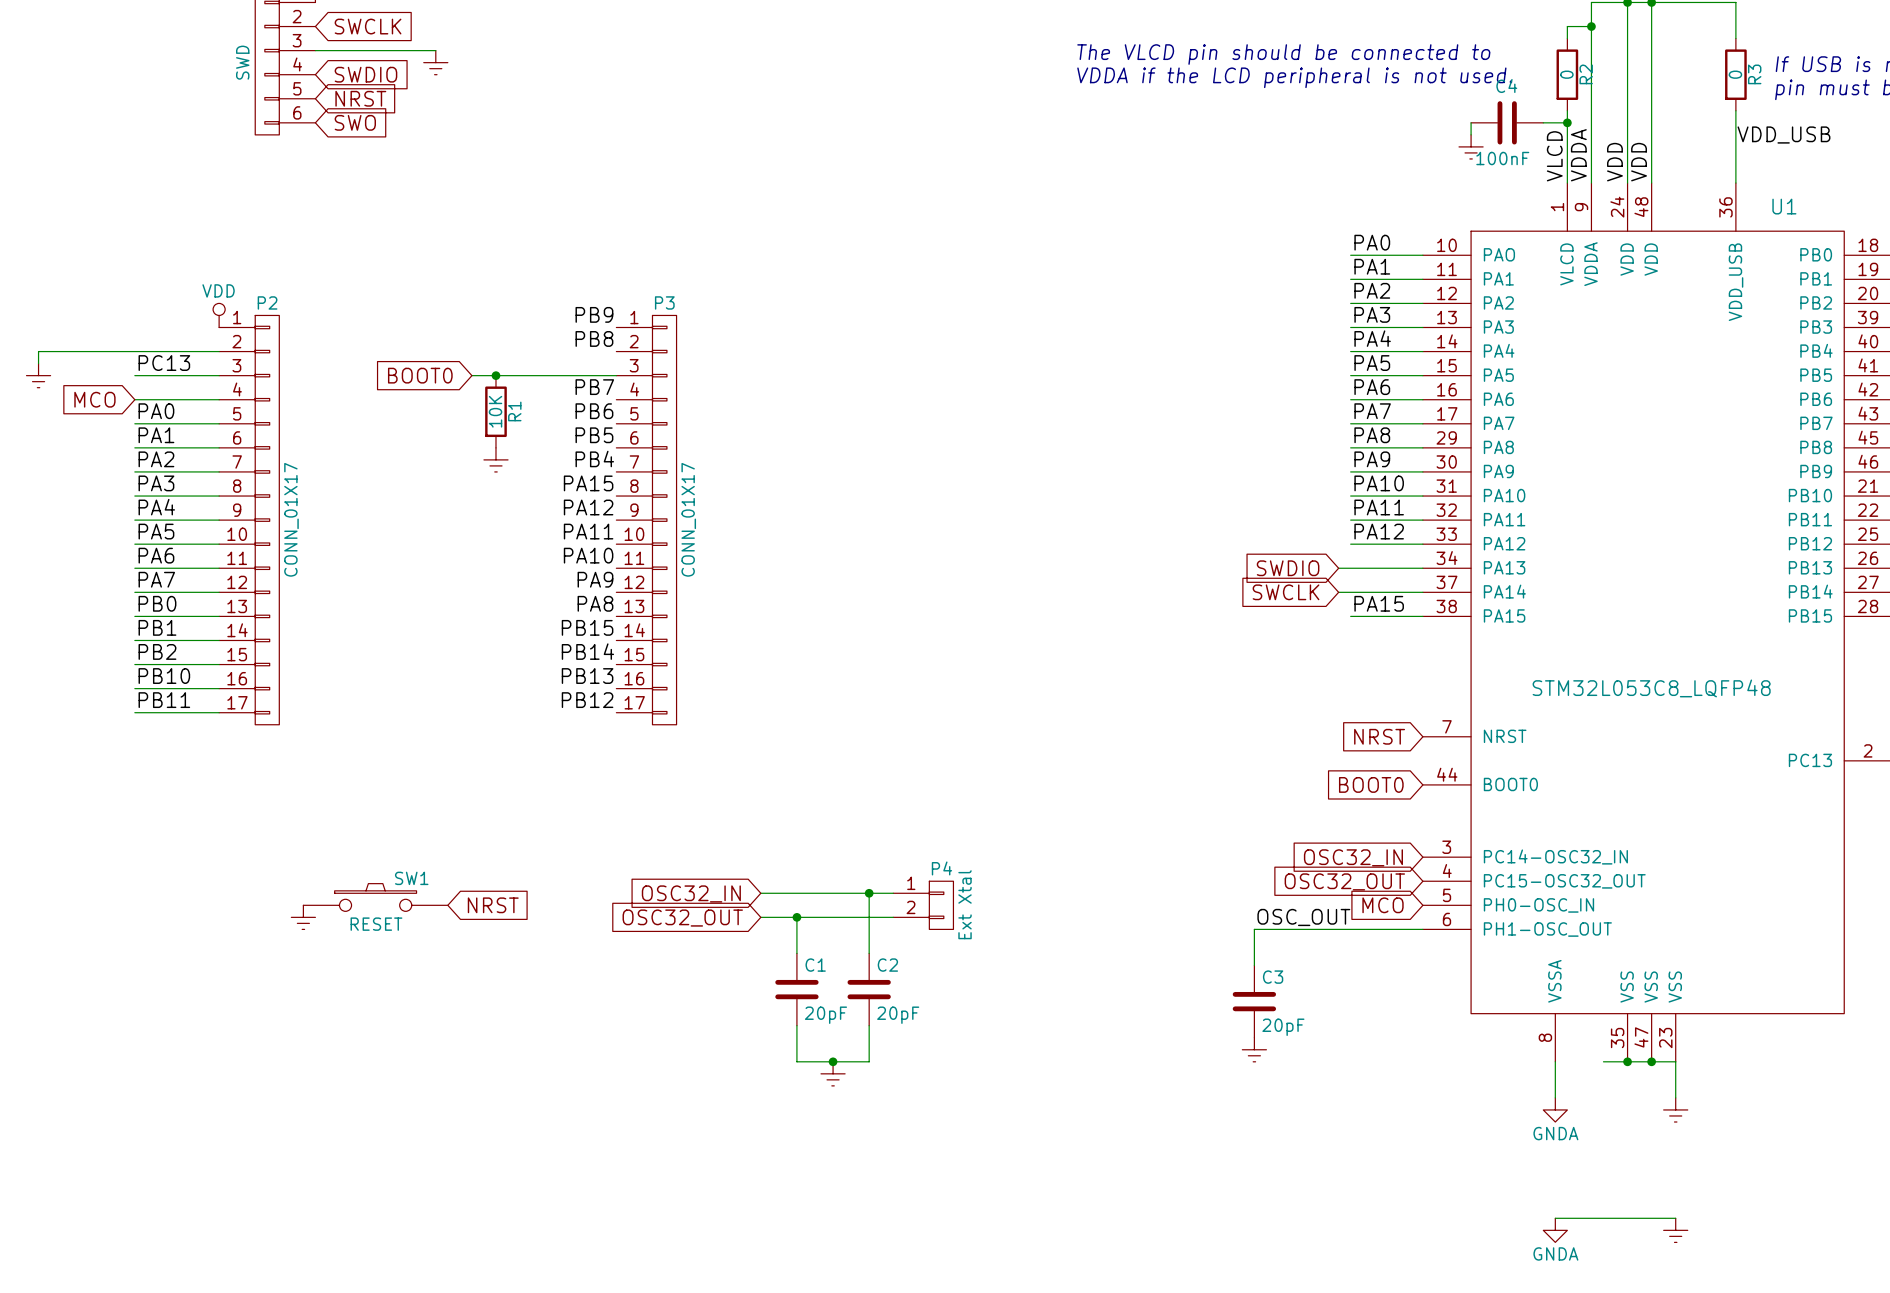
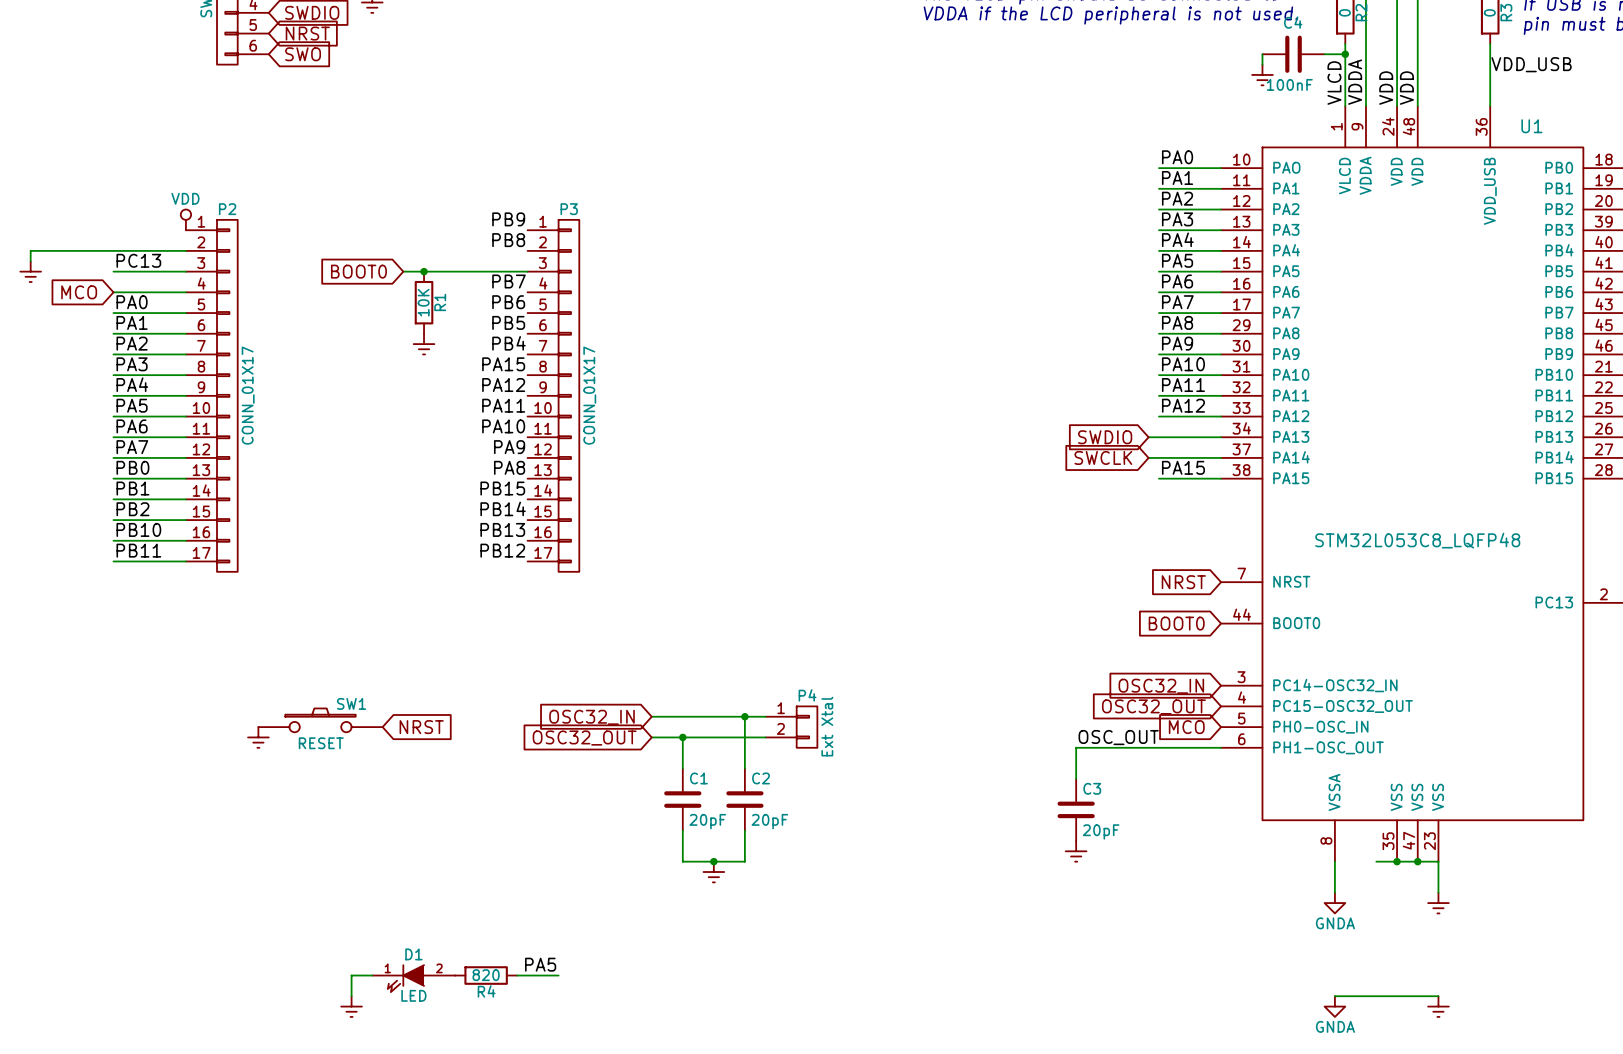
label: none -> PA5 (540, 964)
wire: none -> (372, 975) (351, 975) (351, 996)
R4: none -> 820 (486, 975)
wire: none -> (517, 975) (558, 975)
D1: none -> LED (413, 978)
power symbol: none -> (351, 1006)

